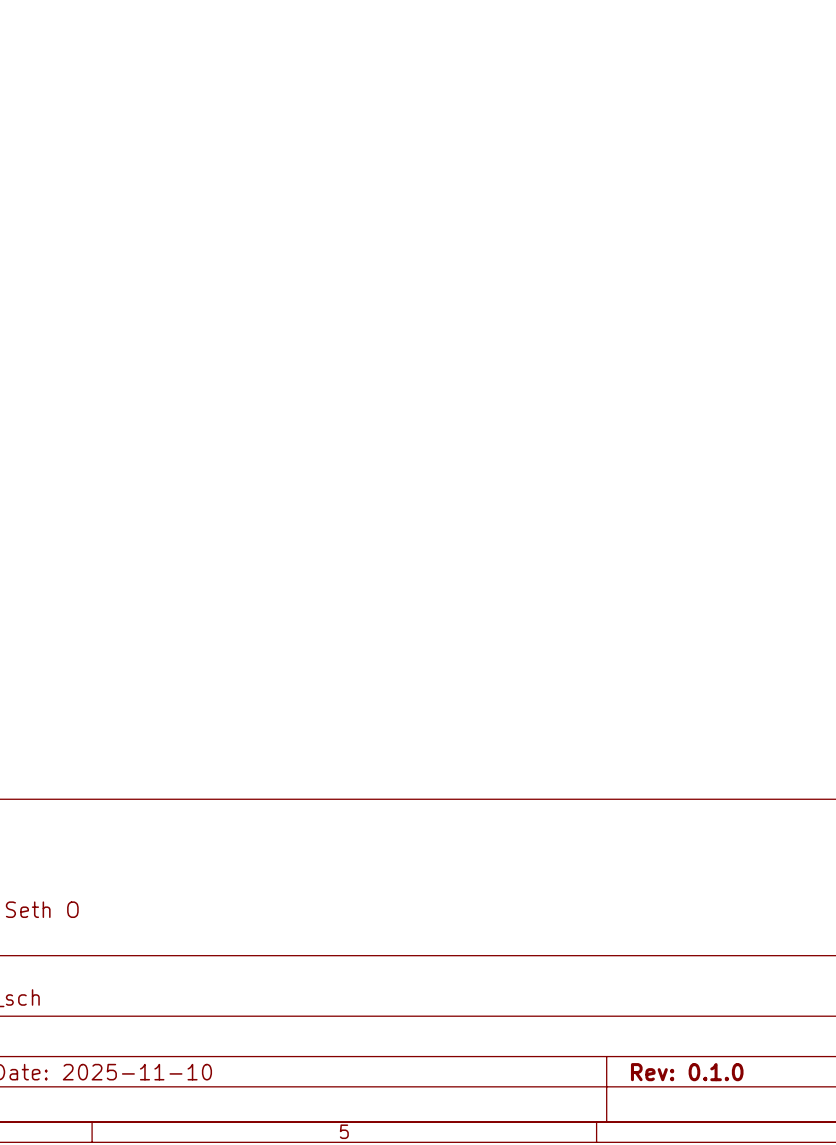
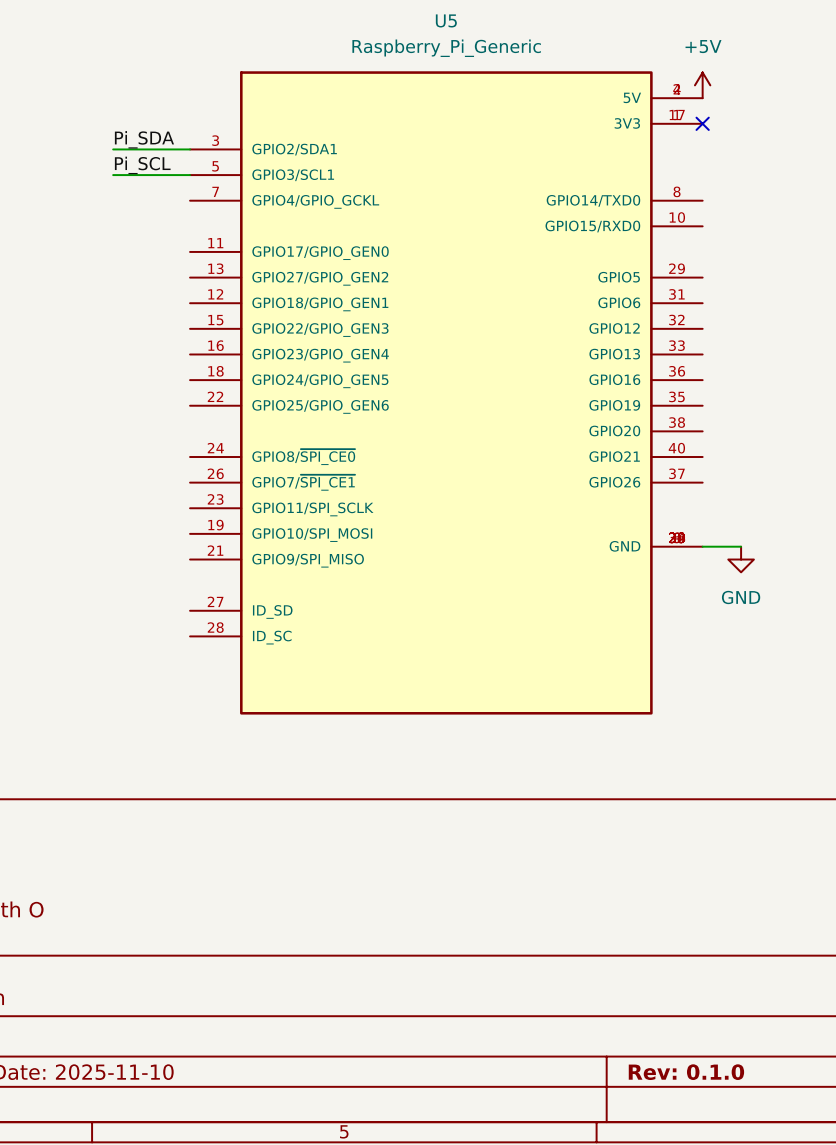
power symbol: none -> +5V (702, 85)
no-connect mark: none -> (702, 123)
label: none -> Pi_SDA (144, 139)
wire: none -> (113, 149) (190, 149)
label: none -> Pi_SCL (142, 165)
wire: none -> (113, 175) (190, 175)
U5: none -> Raspberry_Pi_Generic (446, 392)
wire: none -> (702, 546) (741, 546)
power symbol: none -> GND (741, 559)

